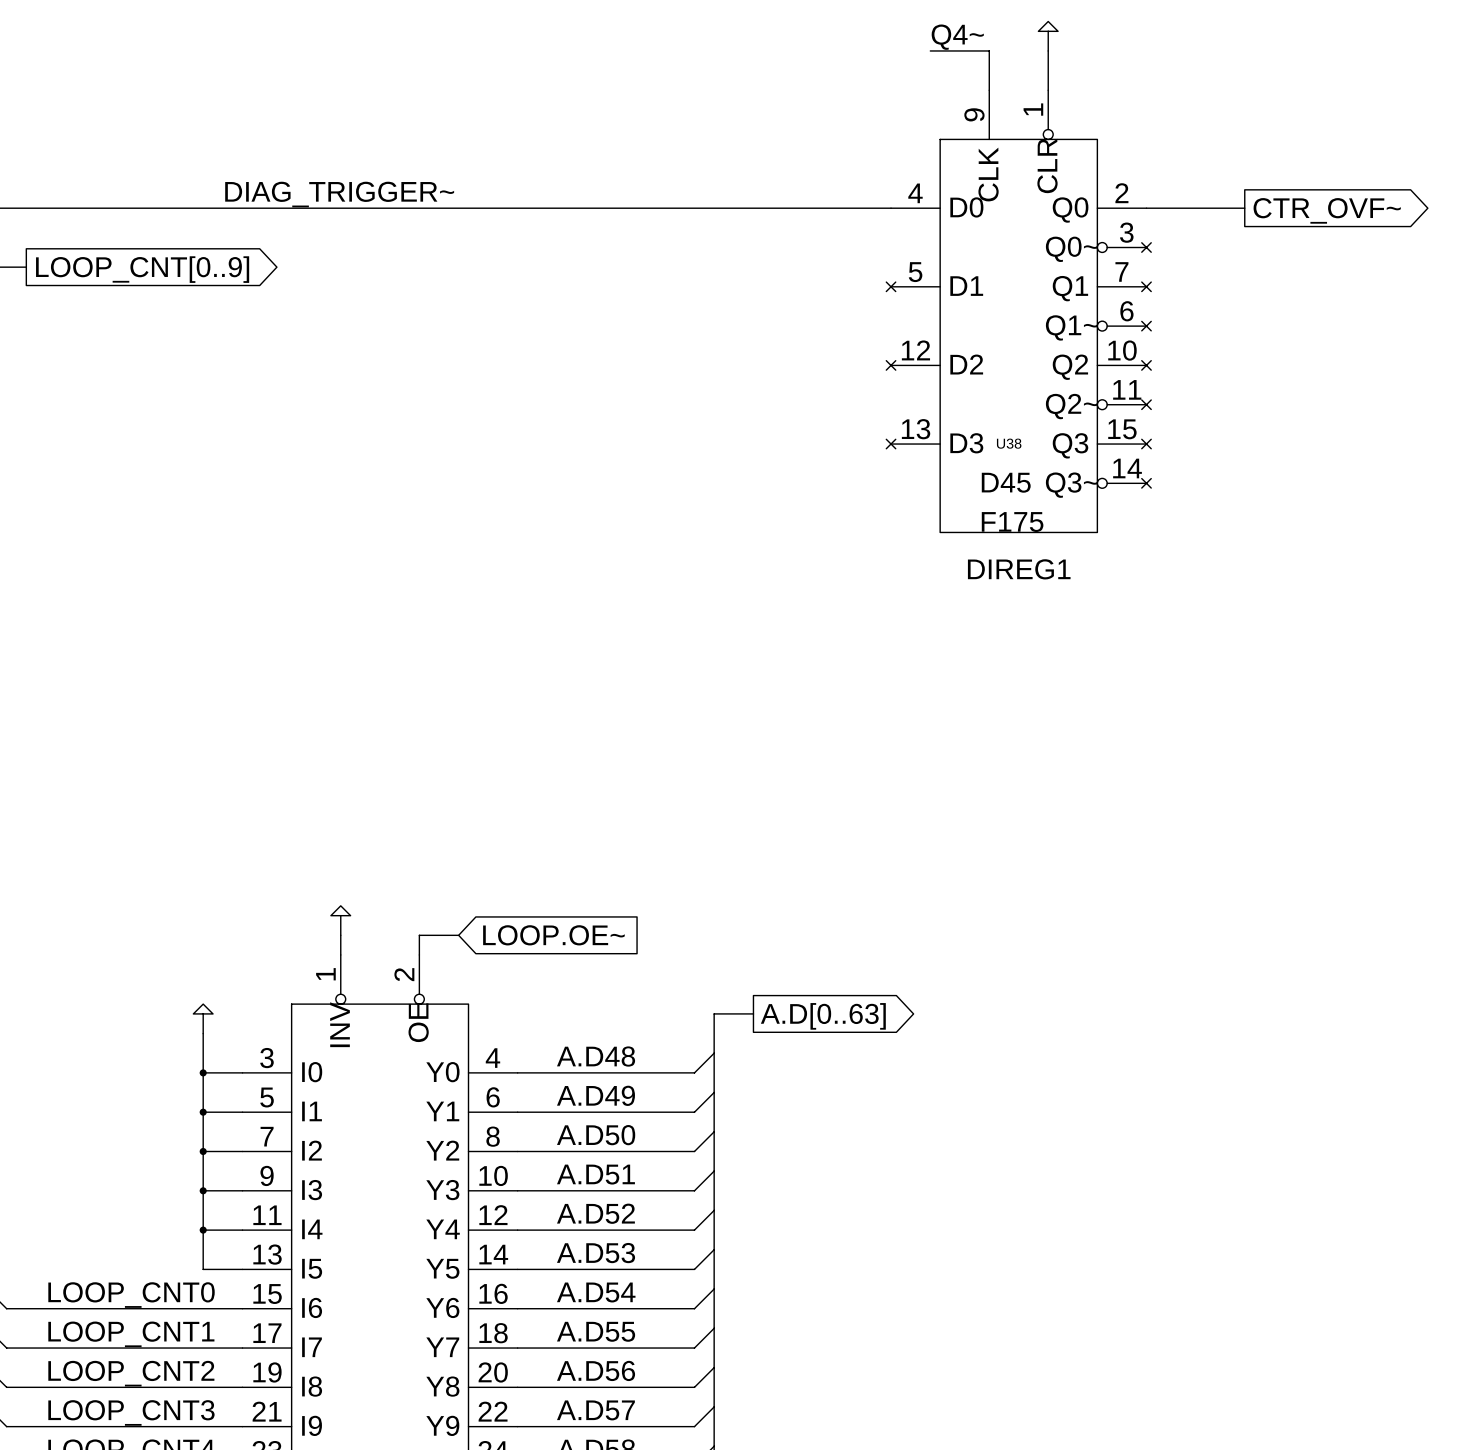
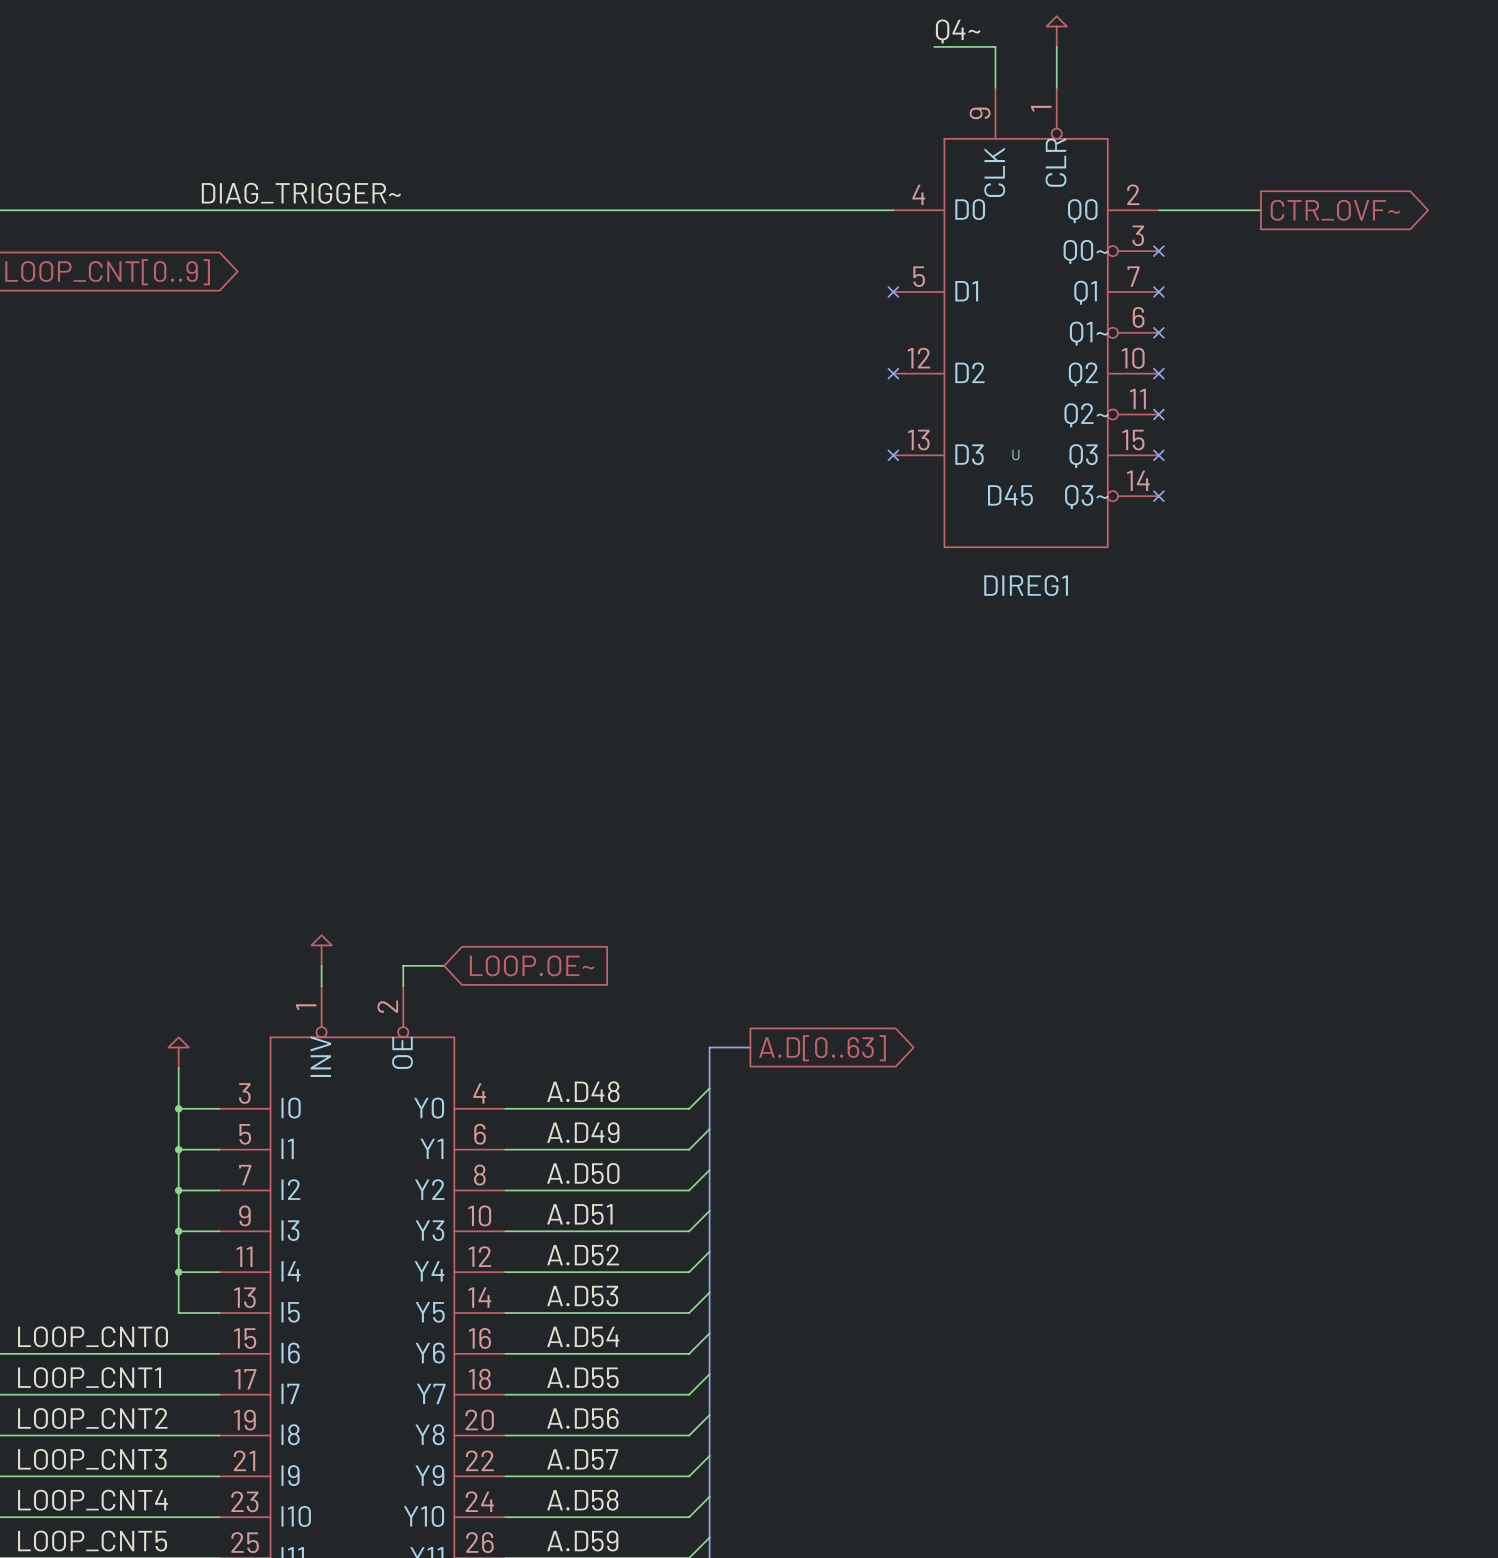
U38 name: U38 (1009, 443) -> U (1015, 455)
U38 value: F175 (1012, 522) -> none

